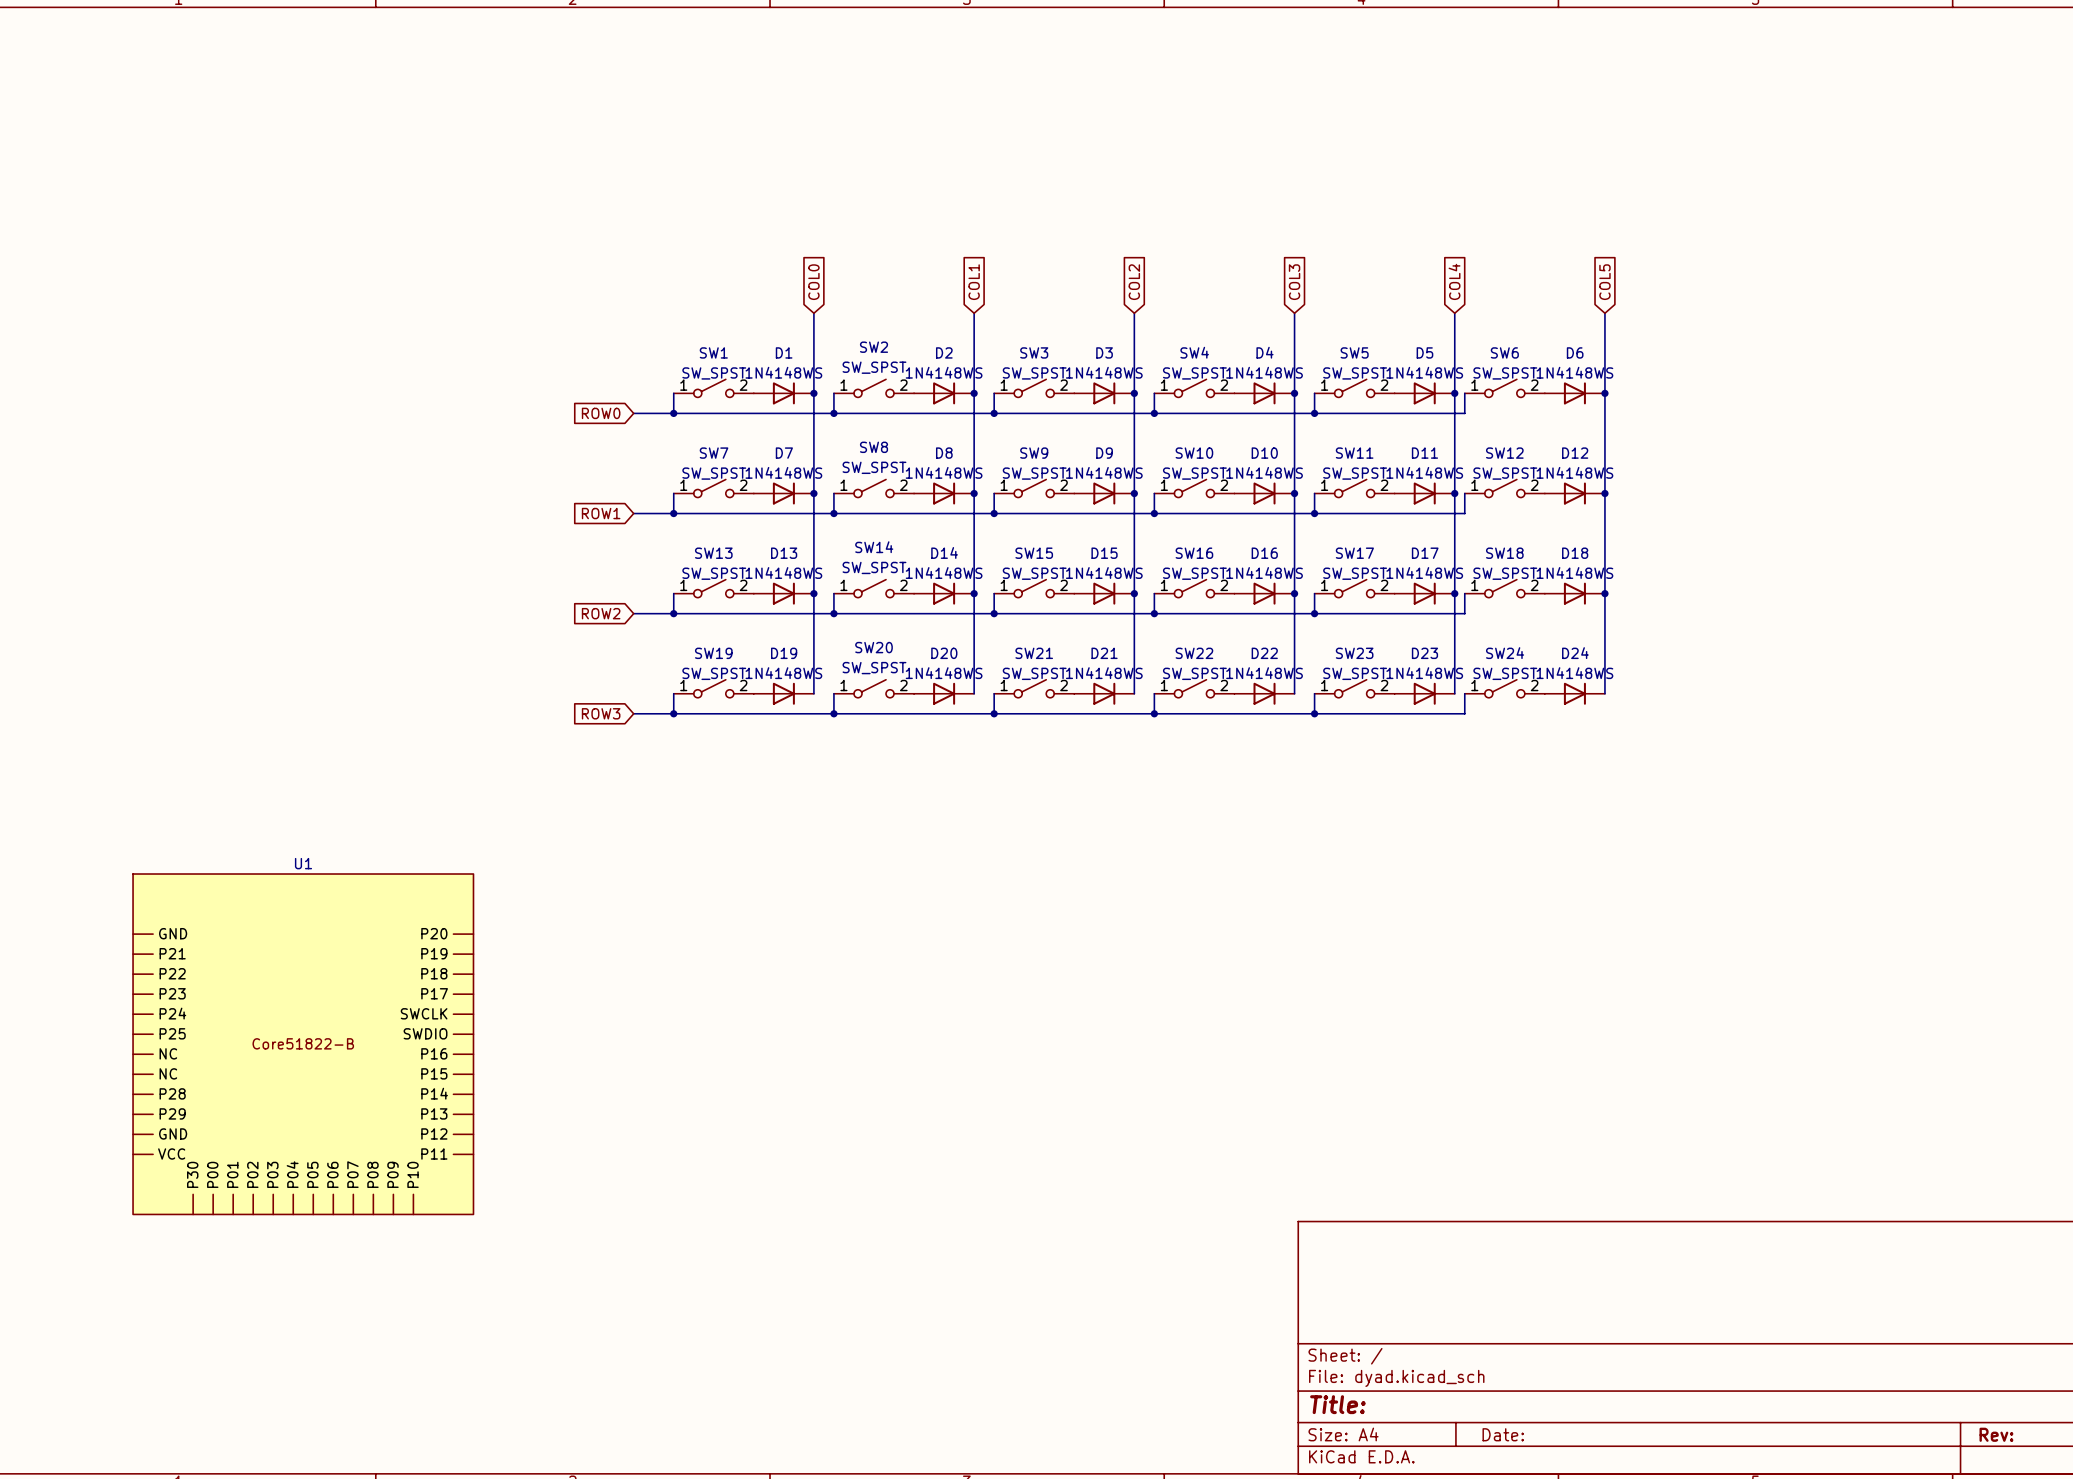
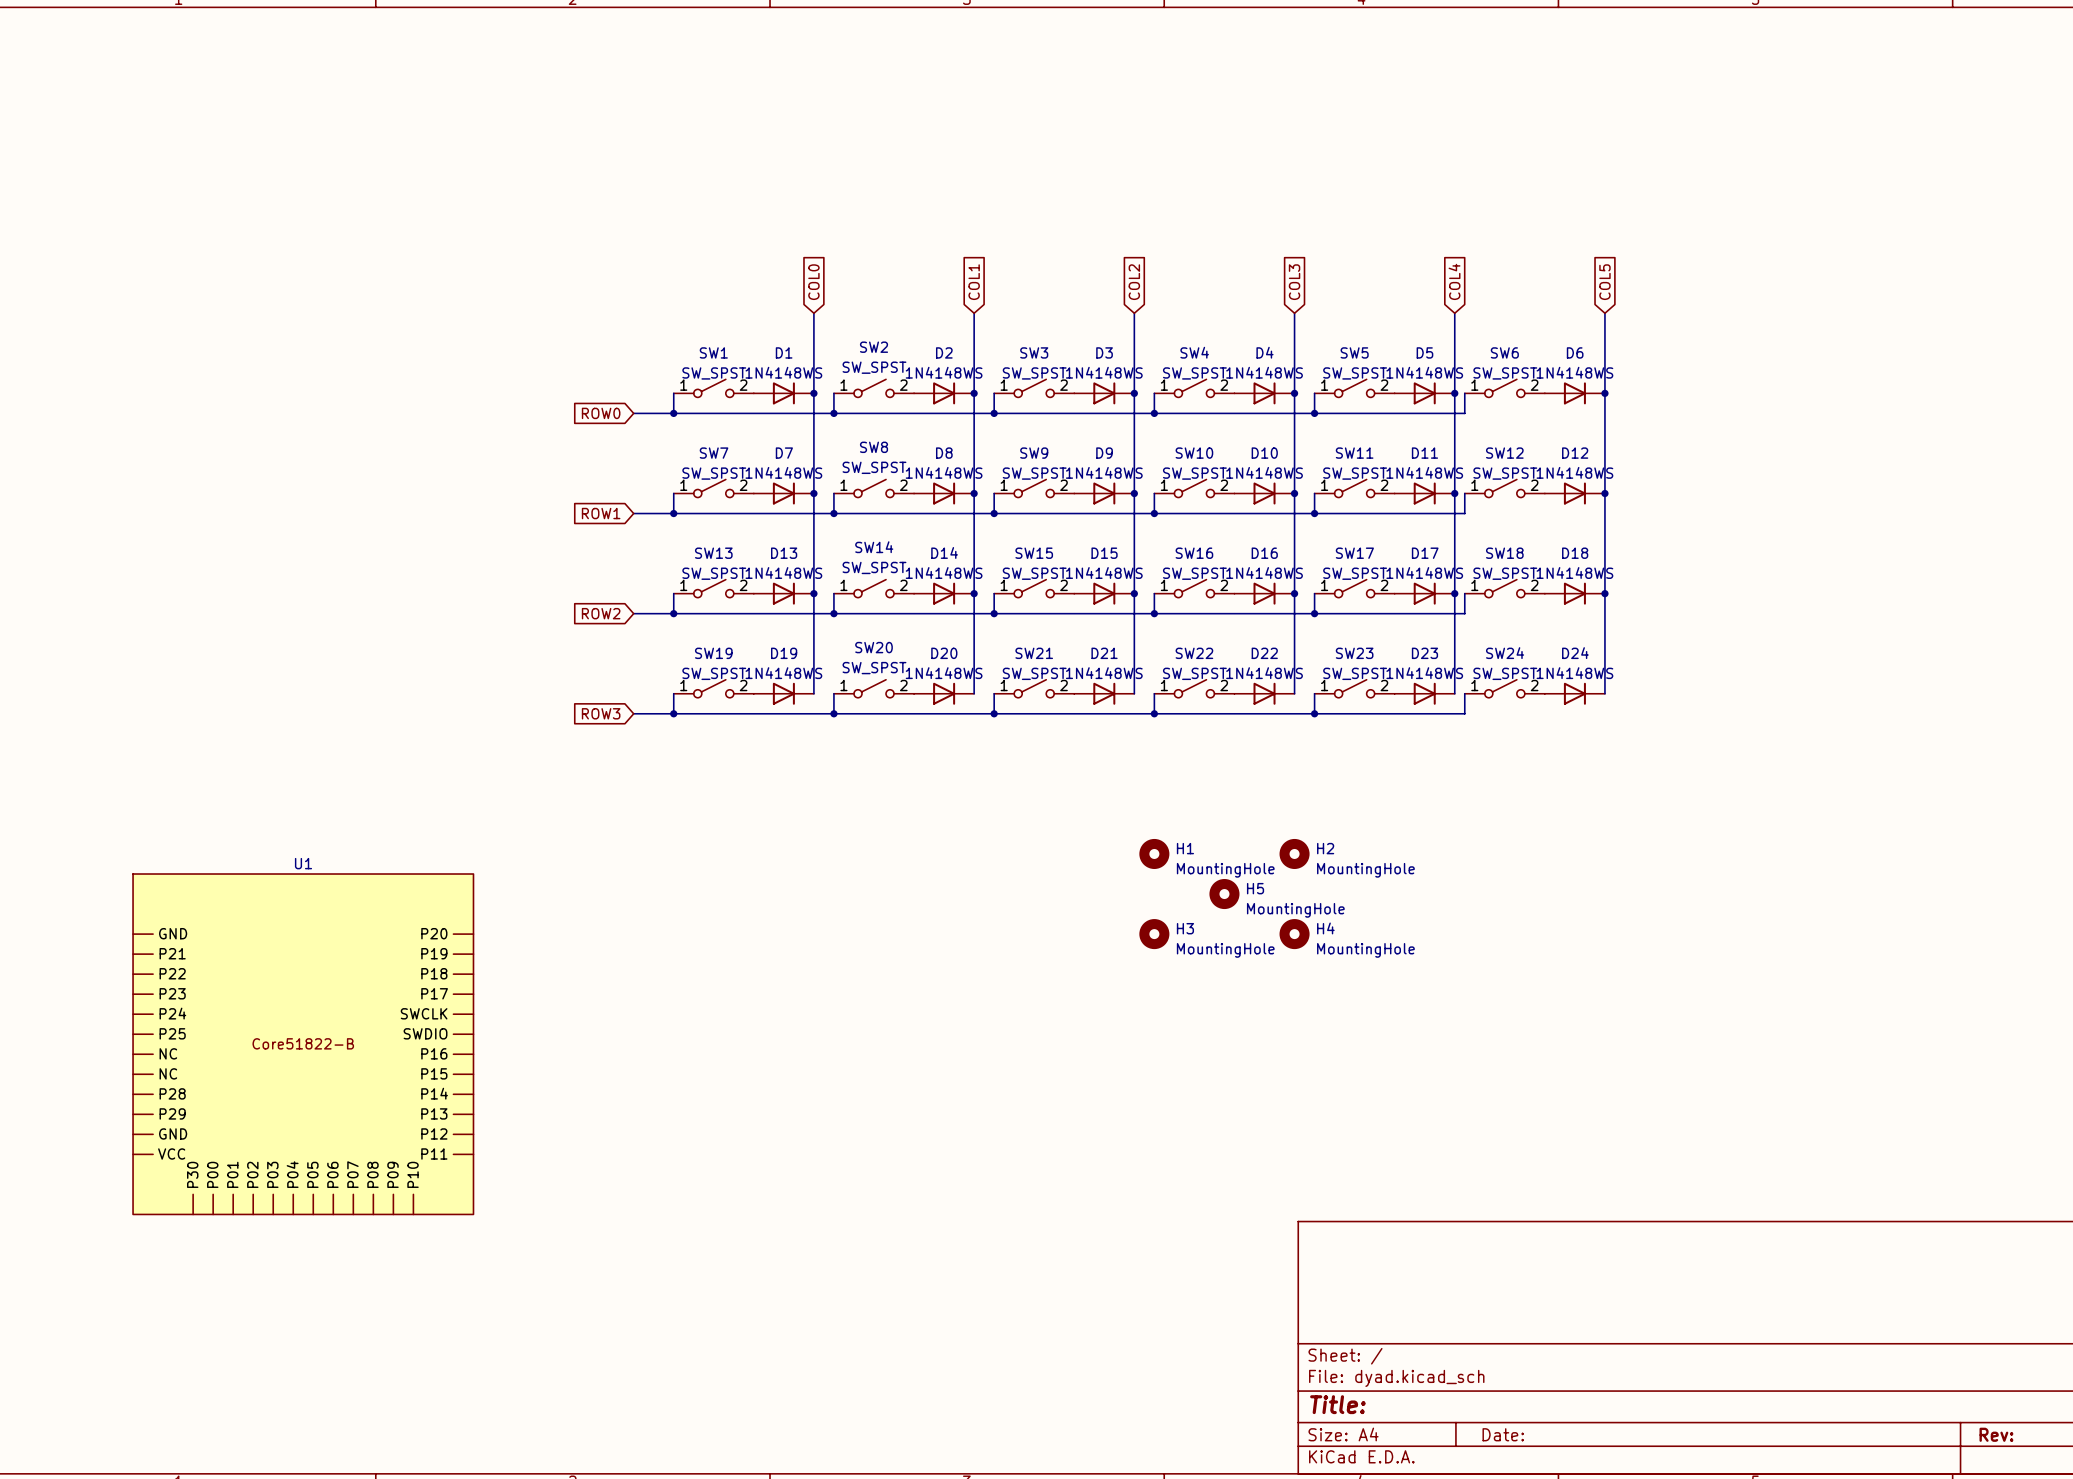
H1: none -> MountingHole (1154, 853)
H2: none -> MountingHole (1294, 853)
H5: none -> MountingHole (1224, 894)
H3: none -> MountingHole (1154, 934)
H4: none -> MountingHole (1294, 934)

